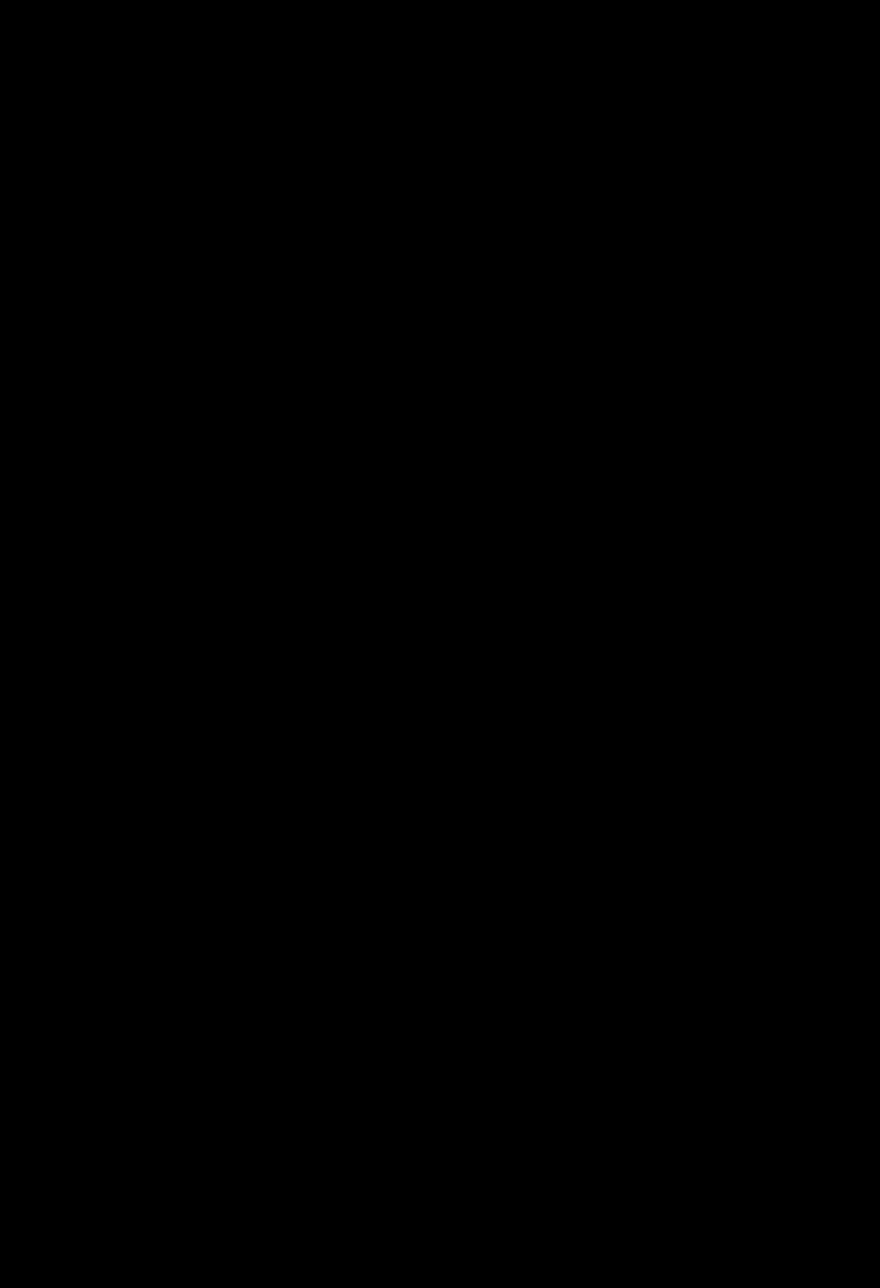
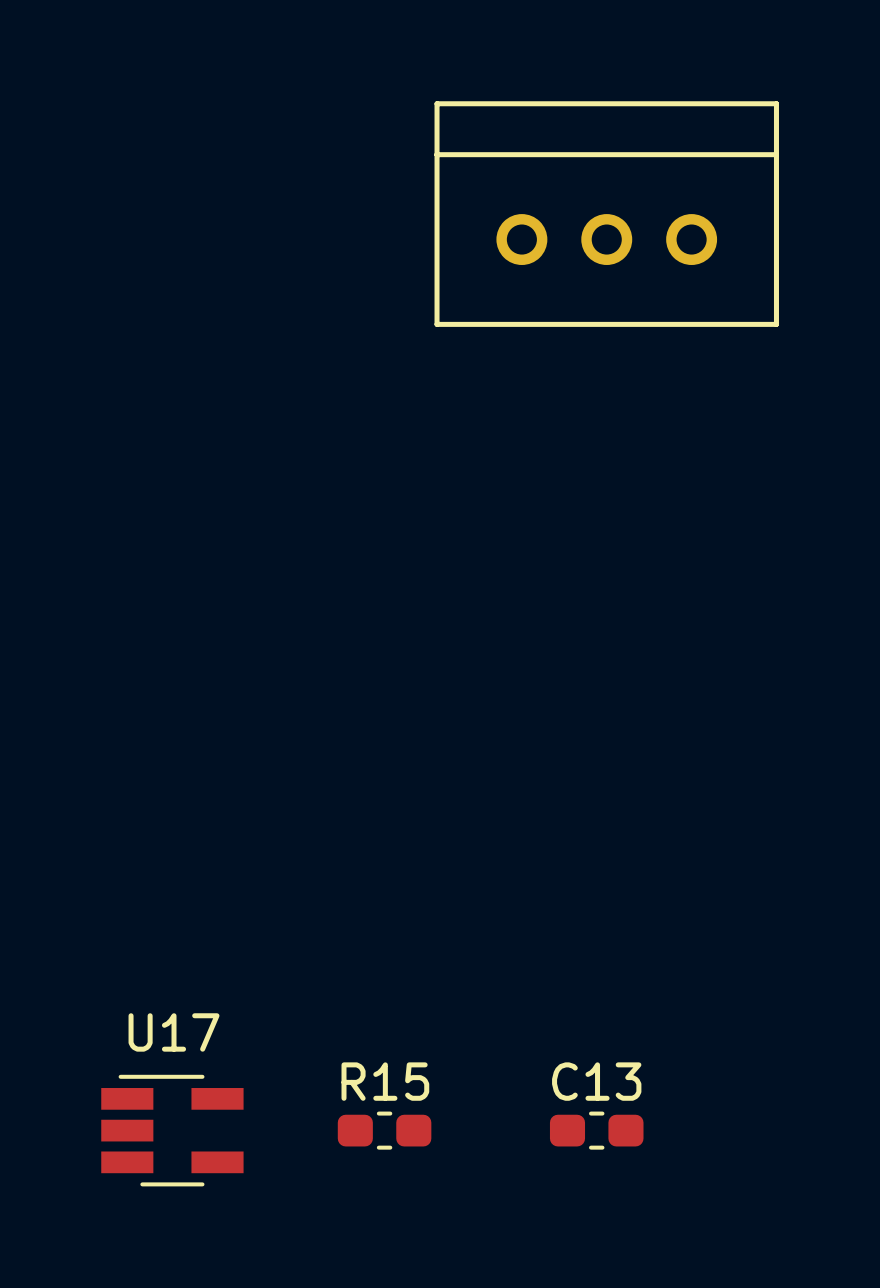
part: none -> (606, 214)
U17: none -> (172, 1130)
R15: none -> (384, 1130)
C13: none -> (596, 1130)

